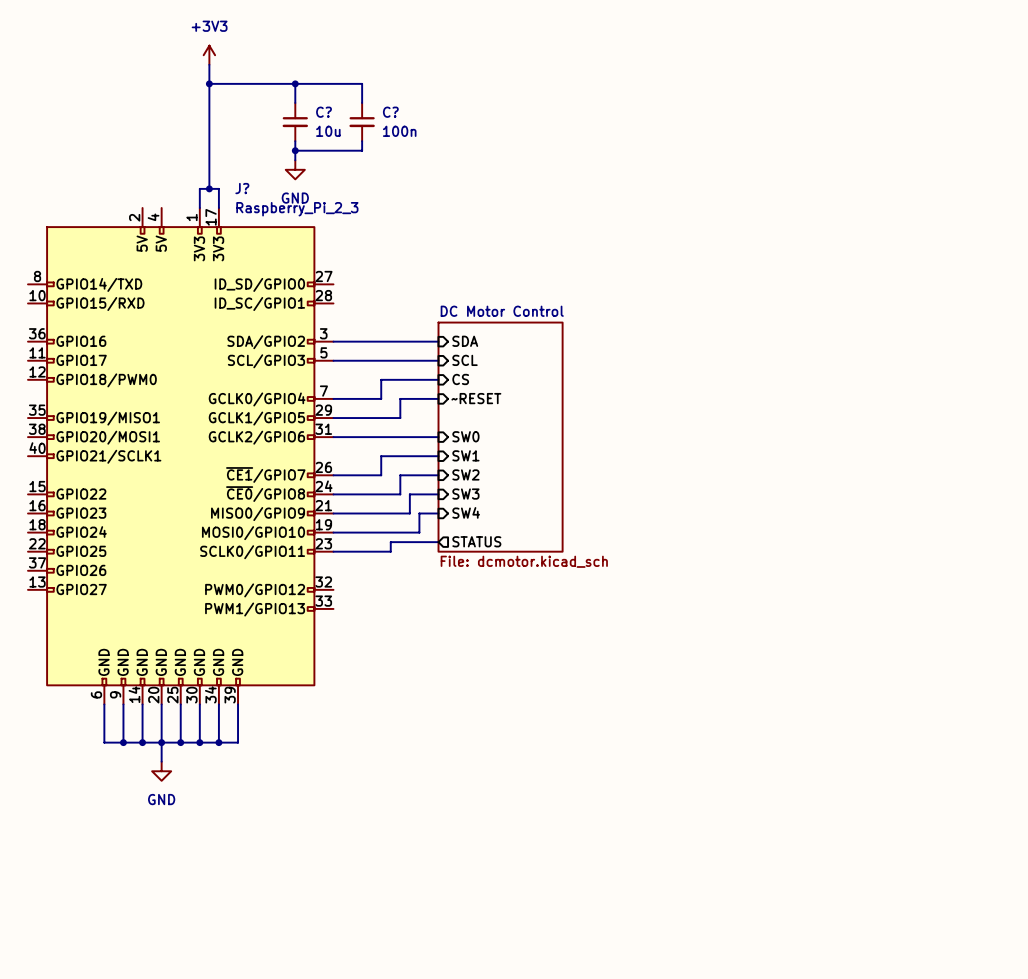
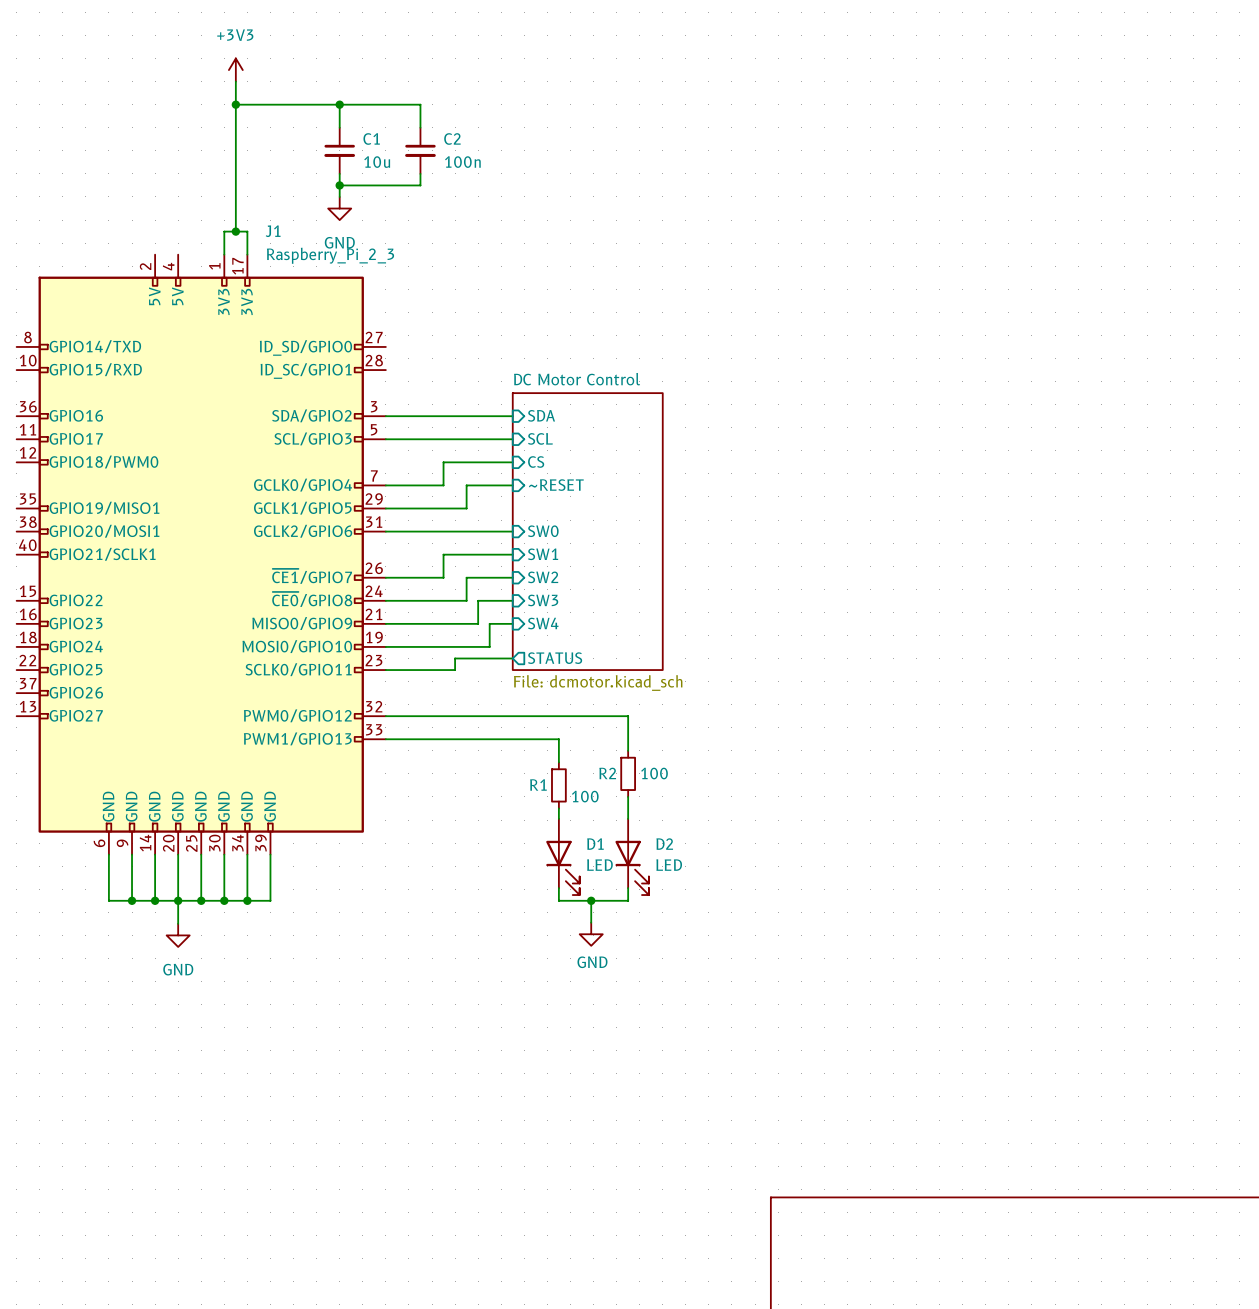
C? name: C? (324, 112) -> C1 (371, 138)
C? name: C? (390, 112) -> C2 (452, 138)
J? name: J? (242, 188) -> J1 (273, 231)
wire: none -> (385, 716) (628, 716) (628, 750)
wire: none -> (385, 739) (558, 739) (558, 762)
R2: none -> 100 (628, 773)
R1: none -> 100 (558, 785)
wire: none -> (628, 796) (628, 818)
wire: none -> (558, 808) (558, 818)
D1: none -> LED (562, 856)
D2: none -> LED (632, 856)
wire: none -> (558, 888) (558, 900) (628, 900) (628, 888)
wire: none -> (591, 900) (591, 922)
junction: none -> (591, 900)
power symbol: none -> GND (591, 934)

